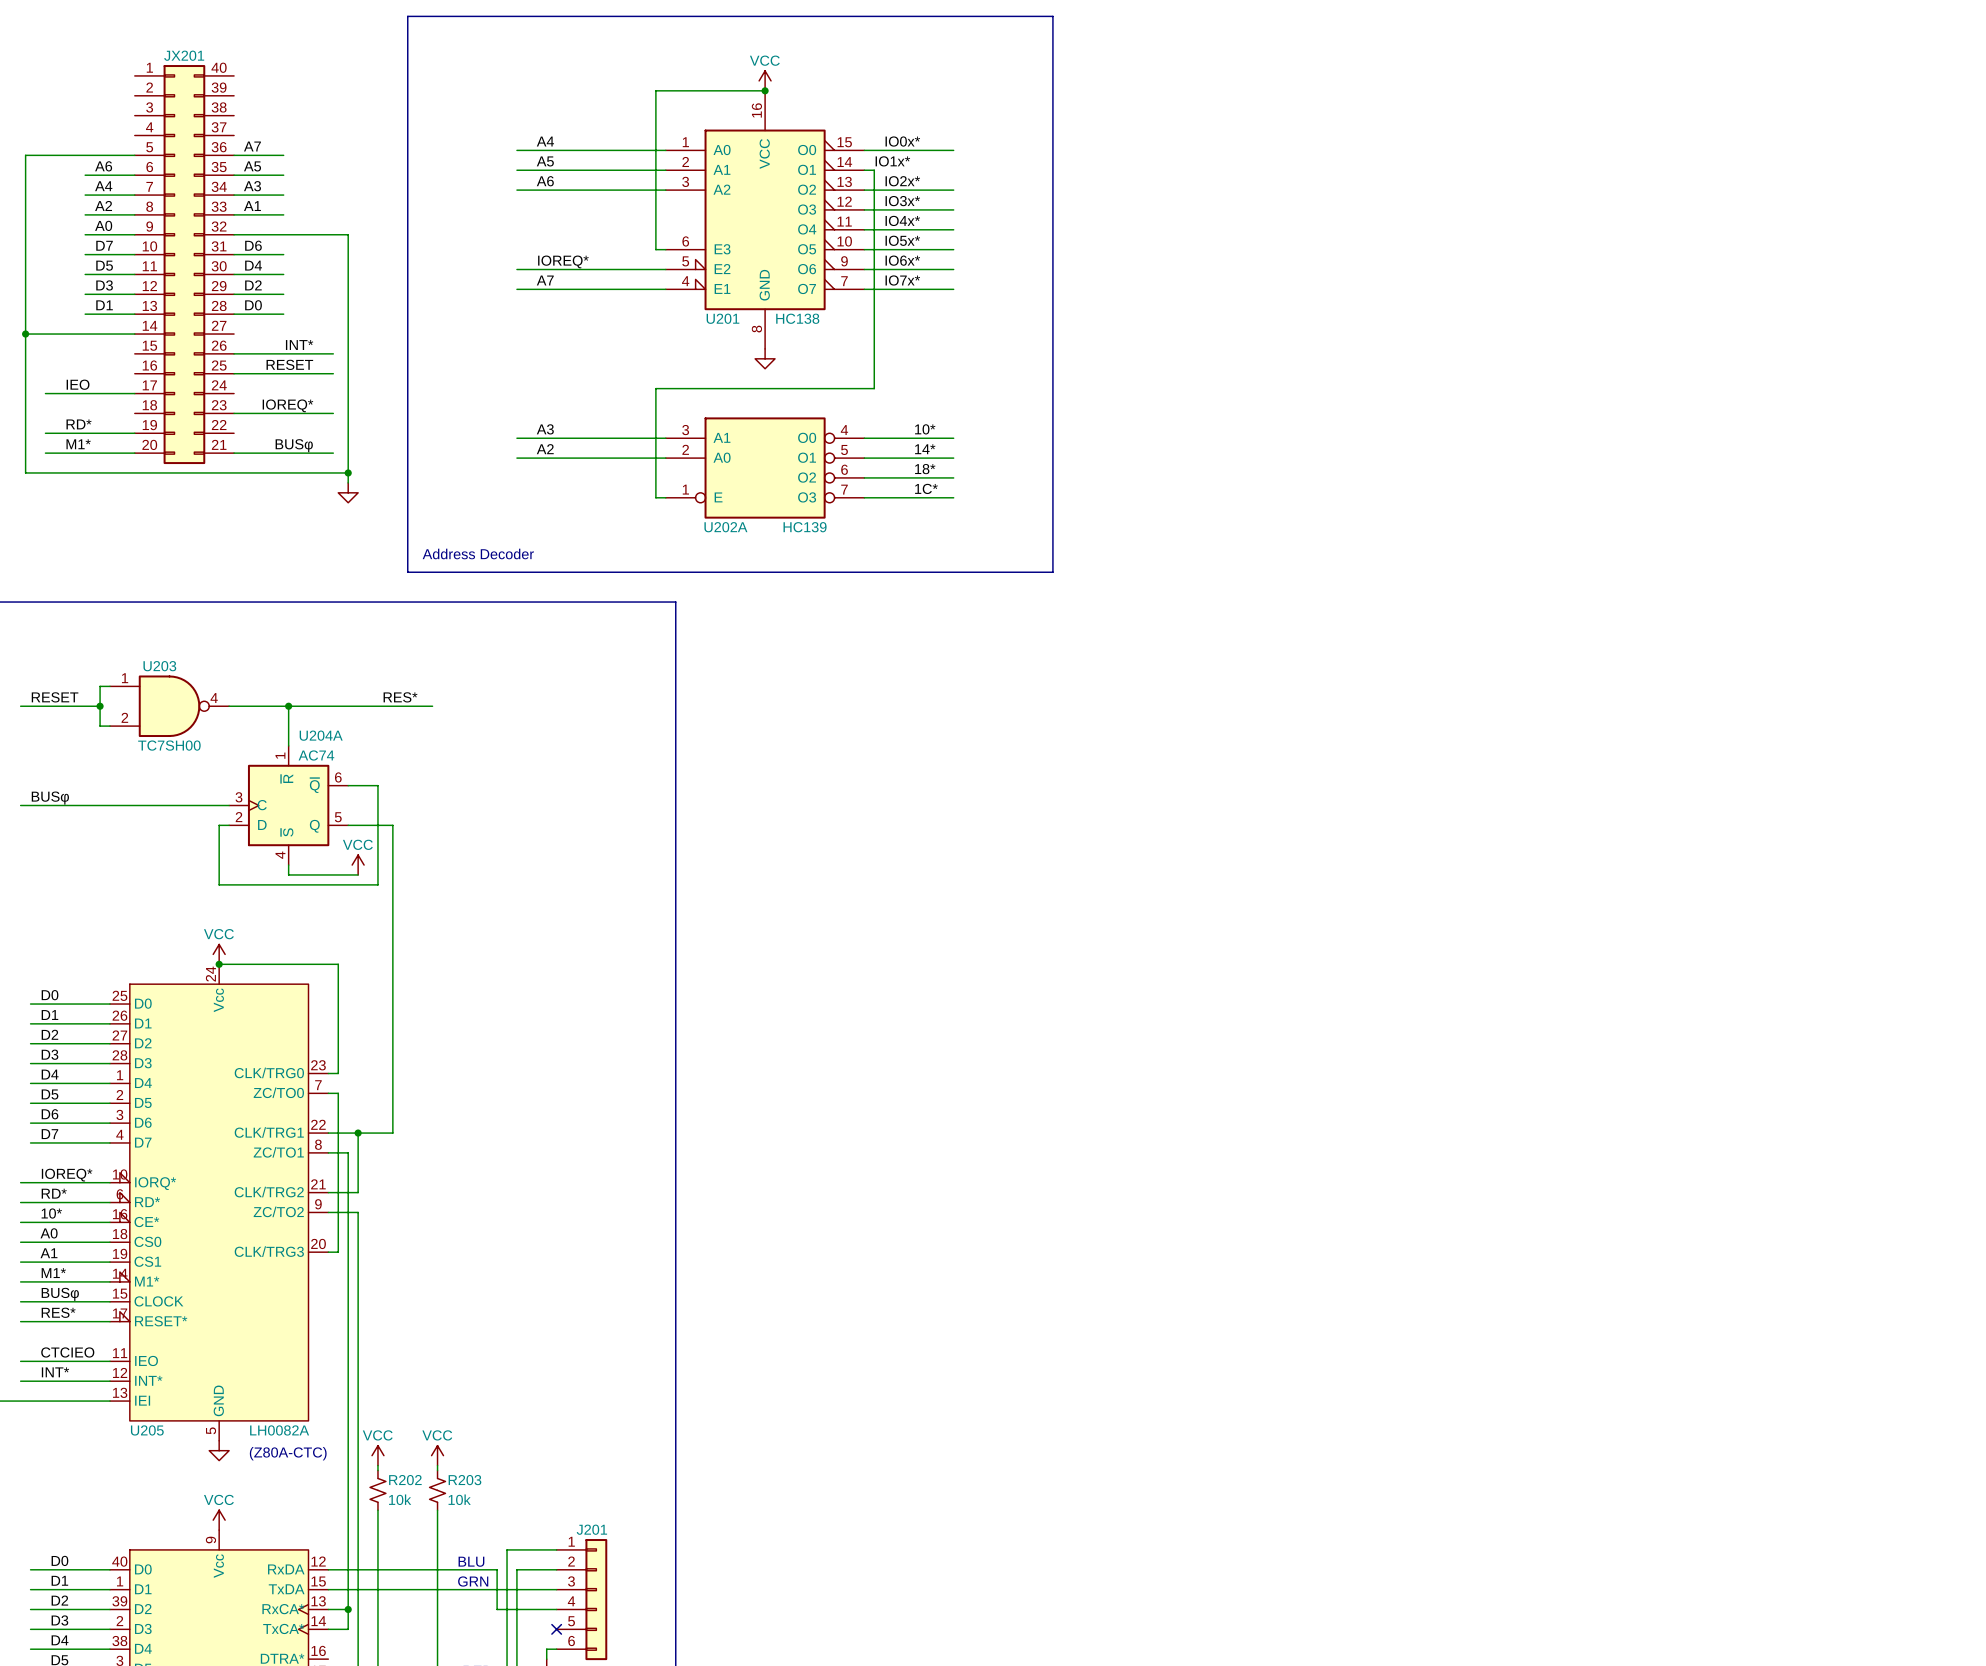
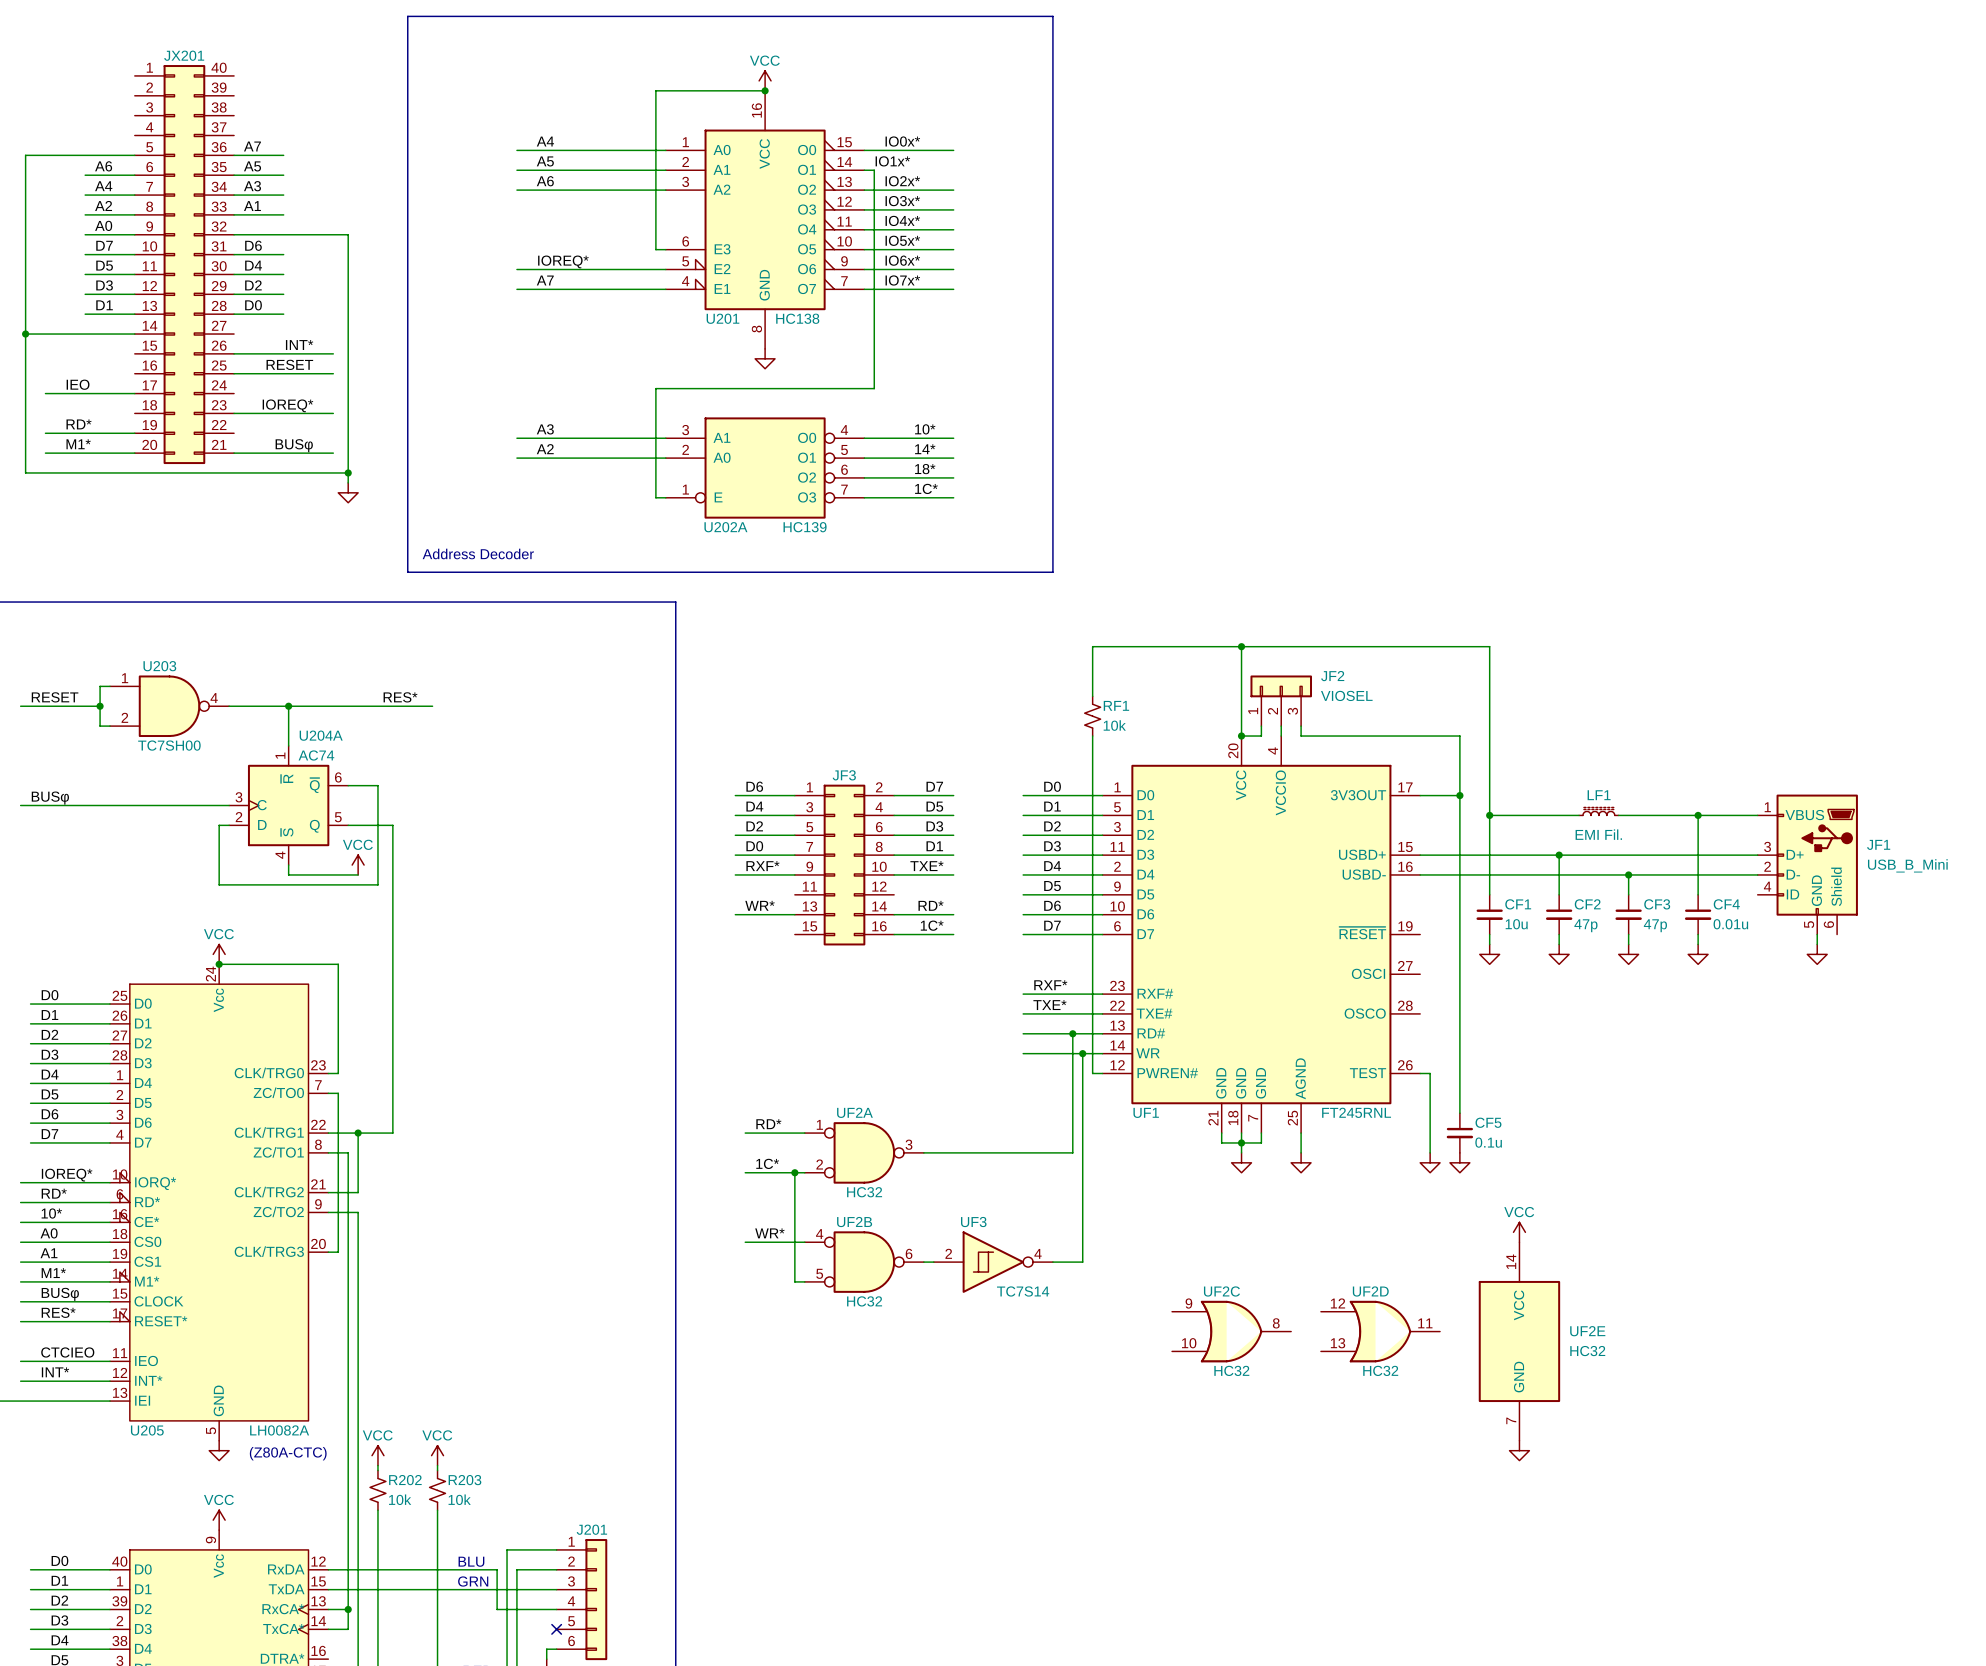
wire: none -> (1241, 646) (1241, 736) (1261, 736) (1261, 726)
junction: none -> (1241, 646)
wire: none -> (1092, 696) (1092, 646) (1489, 646) (1489, 894)
JF2: none -> VIOSEL (1281, 700)
RF1: none -> 10k (1092, 716)
wire: none -> (1281, 726) (1281, 736)
wire: none -> (1301, 726) (1301, 736) (1459, 736) (1459, 1113)
wire: none -> (1092, 736) (1092, 1073) (1102, 1073)
junction: none -> (1241, 736)
label: none -> D6 (754, 786)
label: none -> D7 (934, 786)
label: none -> D0 (1052, 786)
wire: none -> (735, 795) (794, 795)
wire: none -> (894, 795) (953, 795)
wire: none -> (1023, 795) (1102, 795)
wire: none -> (1420, 795) (1459, 795)
junction: none -> (1459, 795)
label: none -> D4 (754, 806)
label: none -> D5 (934, 806)
label: none -> D1 (1052, 806)
LF1: none -> EMI Fil. (1598, 811)
wire: none -> (735, 815) (794, 815)
wire: none -> (894, 815) (953, 815)
wire: none -> (1023, 815) (1102, 815)
wire: none -> (1489, 815) (1579, 815)
junction: none -> (1489, 815)
wire: none -> (1618, 815) (1757, 815)
wire: none -> (1698, 815) (1698, 894)
junction: none -> (1698, 815)
label: none -> D2 (754, 826)
label: none -> D3 (934, 826)
label: none -> D2 (1052, 826)
wire: none -> (735, 835) (794, 835)
wire: none -> (894, 835) (953, 835)
wire: none -> (1023, 835) (1102, 835)
label: none -> D0 (754, 846)
label: none -> D1 (934, 846)
label: none -> D3 (1052, 846)
wire: none -> (735, 855) (794, 855)
wire: none -> (894, 855) (953, 855)
wire: none -> (1023, 855) (1102, 855)
wire: none -> (1420, 855) (1757, 855)
wire: none -> (1559, 855) (1559, 894)
junction: none -> (1559, 855)
JF1: none -> USB_B_Mini (1807, 864)
JF3: none -> (844, 865)
label: none -> RXF* (762, 866)
label: none -> TXE* (926, 866)
label: none -> D4 (1052, 866)
wire: none -> (735, 874) (794, 874)
wire: none -> (894, 874) (953, 874)
wire: none -> (1023, 874) (1102, 874)
wire: none -> (1420, 874) (1757, 874)
wire: none -> (1628, 874) (1628, 894)
junction: none -> (1628, 874)
label: none -> D5 (1052, 886)
wire: none -> (1023, 894) (1102, 894)
label: none -> WR* (759, 905)
label: none -> RD* (931, 905)
label: none -> D6 (1052, 905)
wire: none -> (735, 914) (794, 914)
wire: none -> (894, 914) (953, 914)
wire: none -> (1023, 914) (1102, 914)
CF1: none -> 10u (1489, 914)
CF2: none -> 47p (1559, 914)
CF3: none -> 47p (1628, 914)
CF4: none -> 0.01u (1698, 914)
label: none -> 1C* (932, 925)
label: none -> D7 (1052, 925)
wire: none -> (894, 934) (953, 934)
wire: none -> (1023, 934) (1102, 934)
UF1: none -> FT245RNL (1261, 934)
wire: none -> (1489, 934) (1489, 944)
wire: none -> (1559, 934) (1559, 944)
wire: none -> (1628, 934) (1628, 944)
wire: none -> (1698, 934) (1698, 944)
wire: none -> (1817, 934) (1817, 944)
power symbol: none -> (1489, 954)
power symbol: none -> (1559, 954)
power symbol: none -> (1628, 954)
power symbol: none -> (1698, 954)
power symbol: none -> (1817, 954)
label: none -> RXF* (1050, 985)
wire: none -> (1023, 994) (1102, 994)
label: none -> TXE* (1049, 1005)
wire: none -> (1023, 1013) (1102, 1013)
wire: none -> (1023, 1033) (1102, 1033)
wire: none -> (1072, 1033) (1072, 1152) (923, 1152)
junction: none -> (1072, 1033)
wire: none -> (1023, 1053) (1102, 1053)
wire: none -> (1082, 1053) (1082, 1262) (1052, 1262)
junction: none -> (1082, 1053)
wire: none -> (1420, 1073) (1430, 1073) (1430, 1152)
label: none -> RD* (768, 1124)
wire: none -> (745, 1133) (804, 1133)
wire: none -> (1221, 1133) (1221, 1142) (1261, 1142) (1261, 1133)
wire: none -> (1241, 1133) (1241, 1152)
wire: none -> (1301, 1133) (1301, 1152)
CF5: none -> 0.1u (1459, 1133)
junction: none -> (1241, 1142)
UF2A: none -> HC32 (864, 1152)
power symbol: none -> (1241, 1162)
power symbol: none -> (1301, 1162)
power symbol: none -> (1430, 1162)
power symbol: none -> (1459, 1162)
label: none -> 1C* (767, 1163)
wire: none -> (745, 1172) (804, 1172)
wire: none -> (794, 1172) (794, 1281) (804, 1281)
junction: none -> (794, 1172)
power symbol: none -> VCC (1519, 1232)
label: none -> WR* (769, 1233)
wire: none -> (745, 1242) (804, 1242)
UF2B: none -> HC32 (864, 1262)
wire: none -> (923, 1262) (933, 1262)
UF3: none -> TC7S14 (993, 1262)
UF2C: none -> HC32 (1231, 1331)
UF2D: none -> HC32 (1380, 1331)
UF2E: none -> HC32 (1519, 1341)
power symbol: none -> (1519, 1450)

